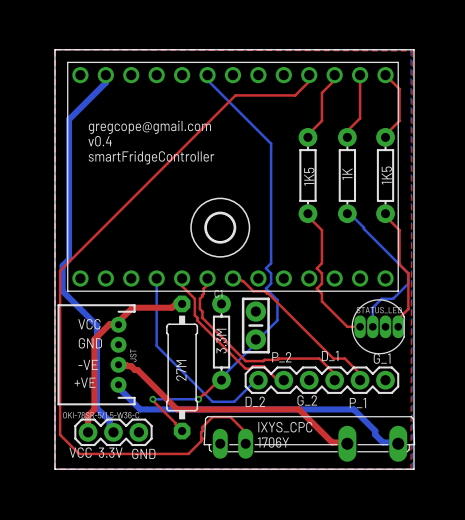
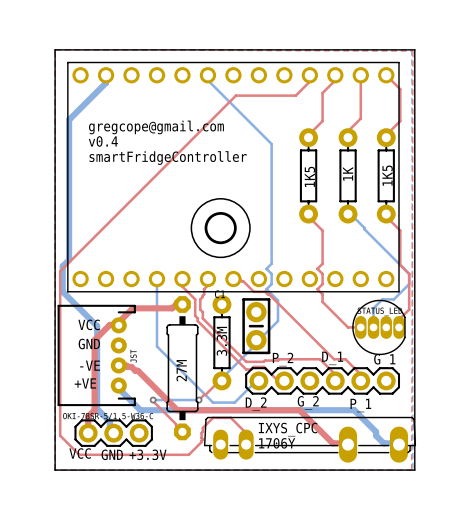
text: 3.3V (110, 452) -> GND (112, 454)
text: GND (143, 453) -> +3.3V (148, 454)

